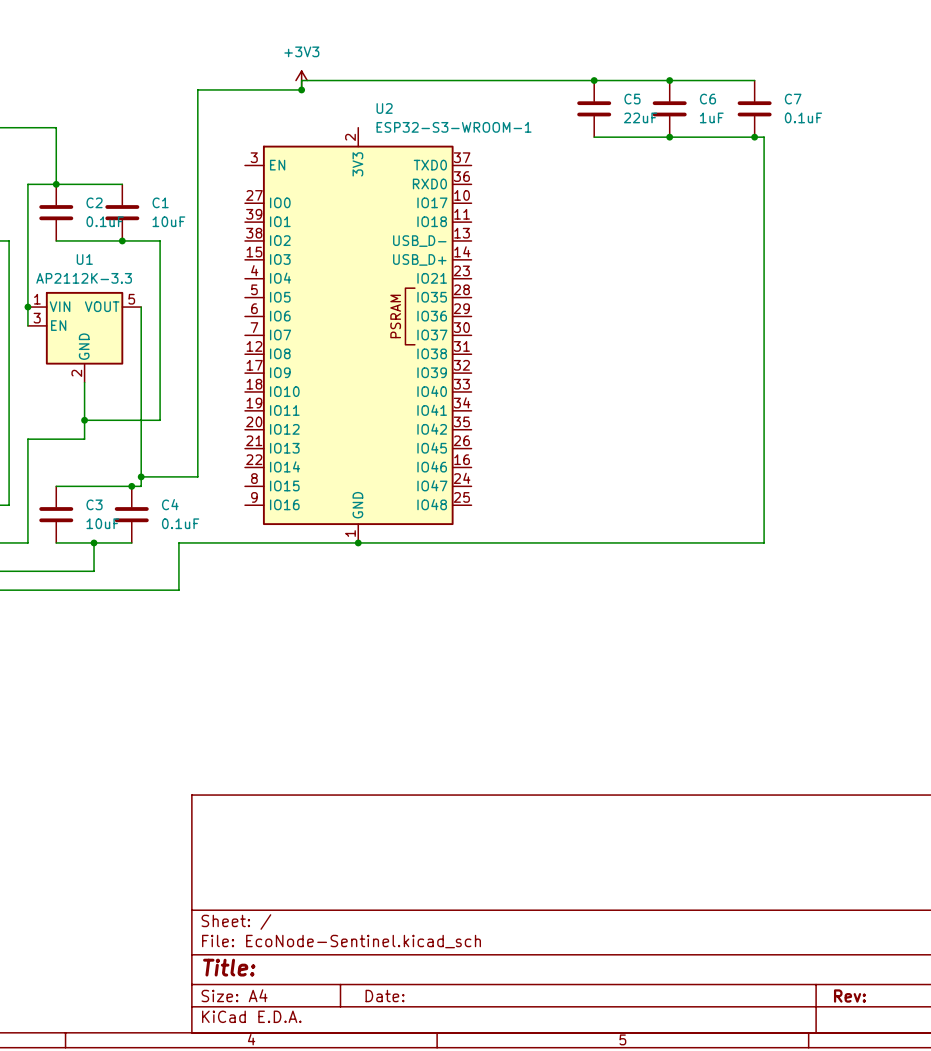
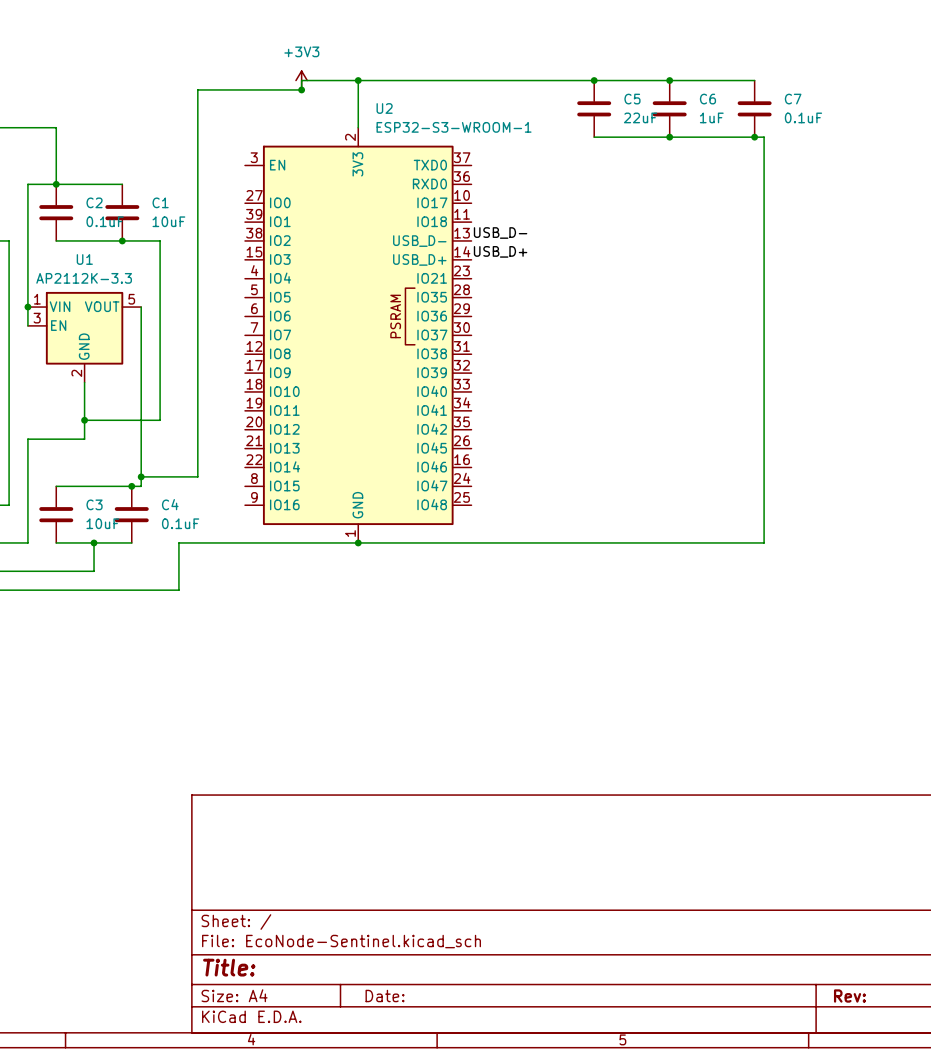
wire: none -> (358, 80) (358, 127)
junction: none -> (358, 80)
label: none -> USB_D- (500, 233)
label: none -> USB_D+ (500, 251)

